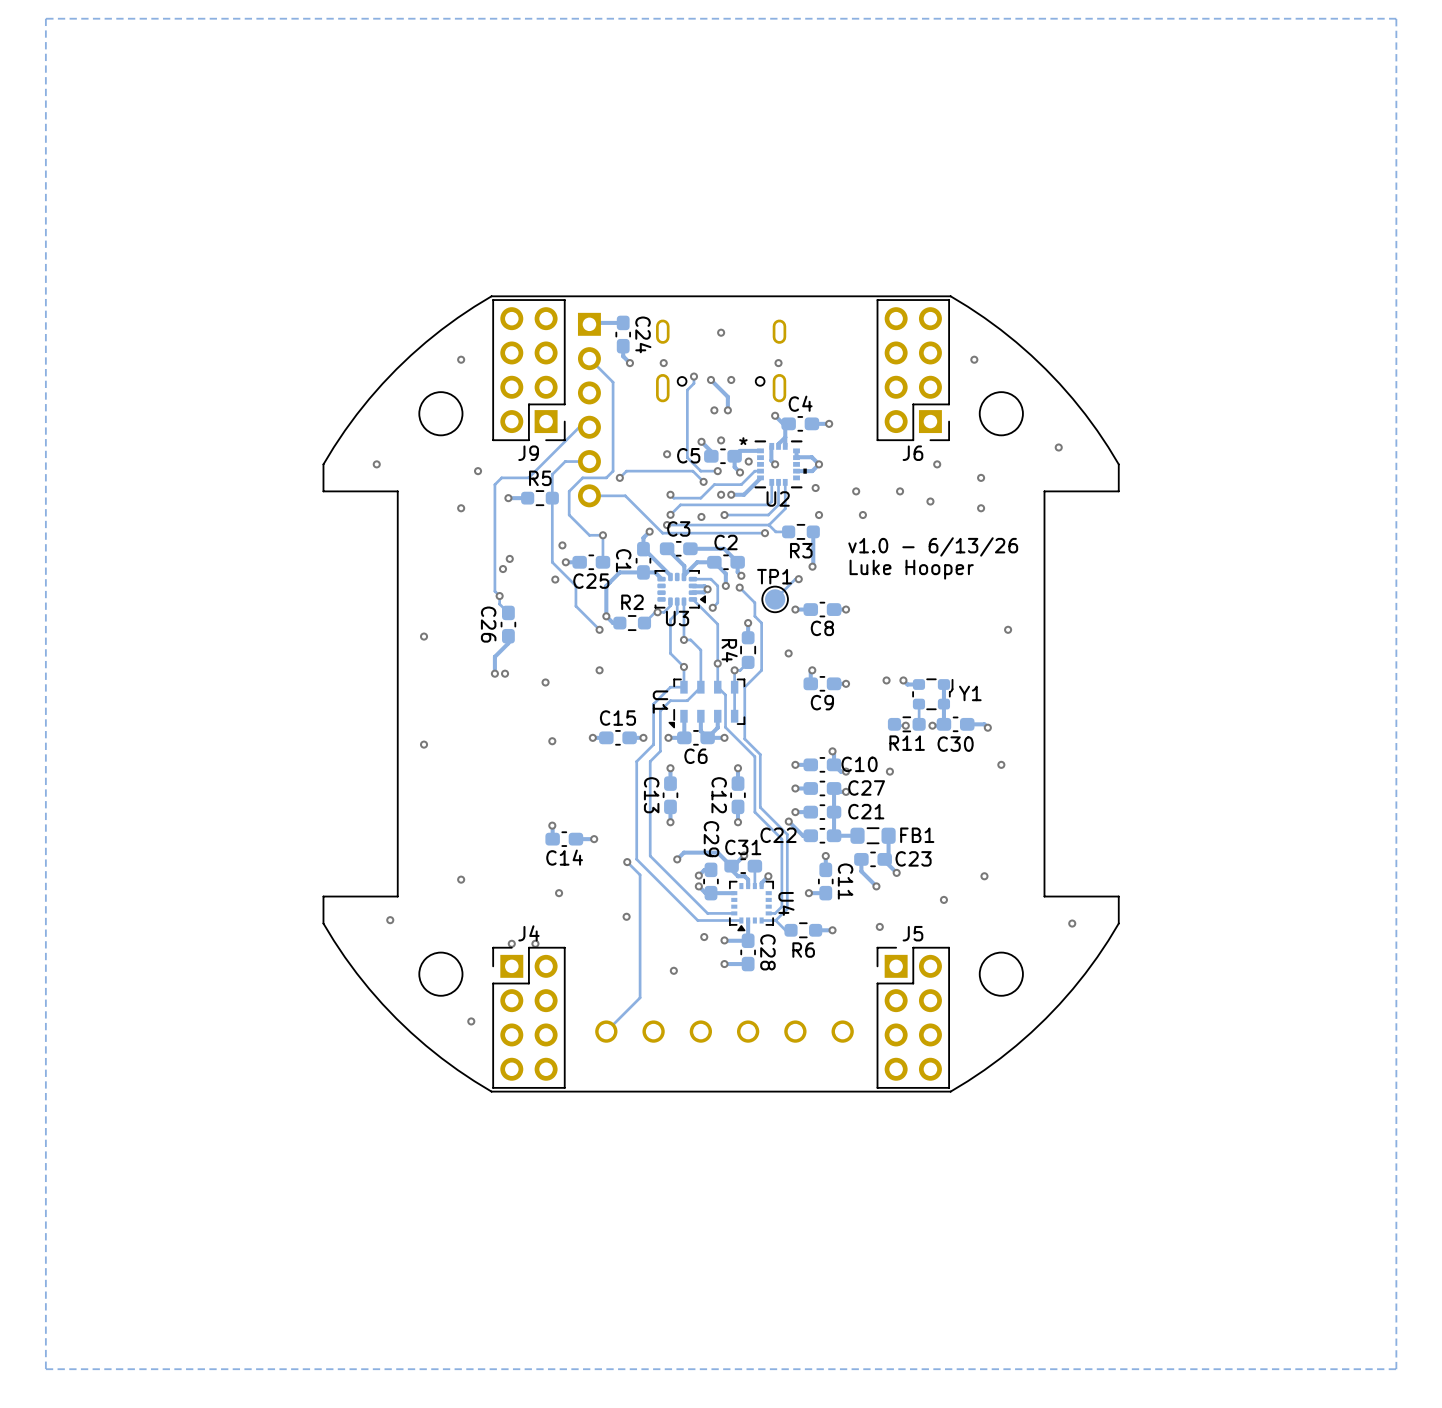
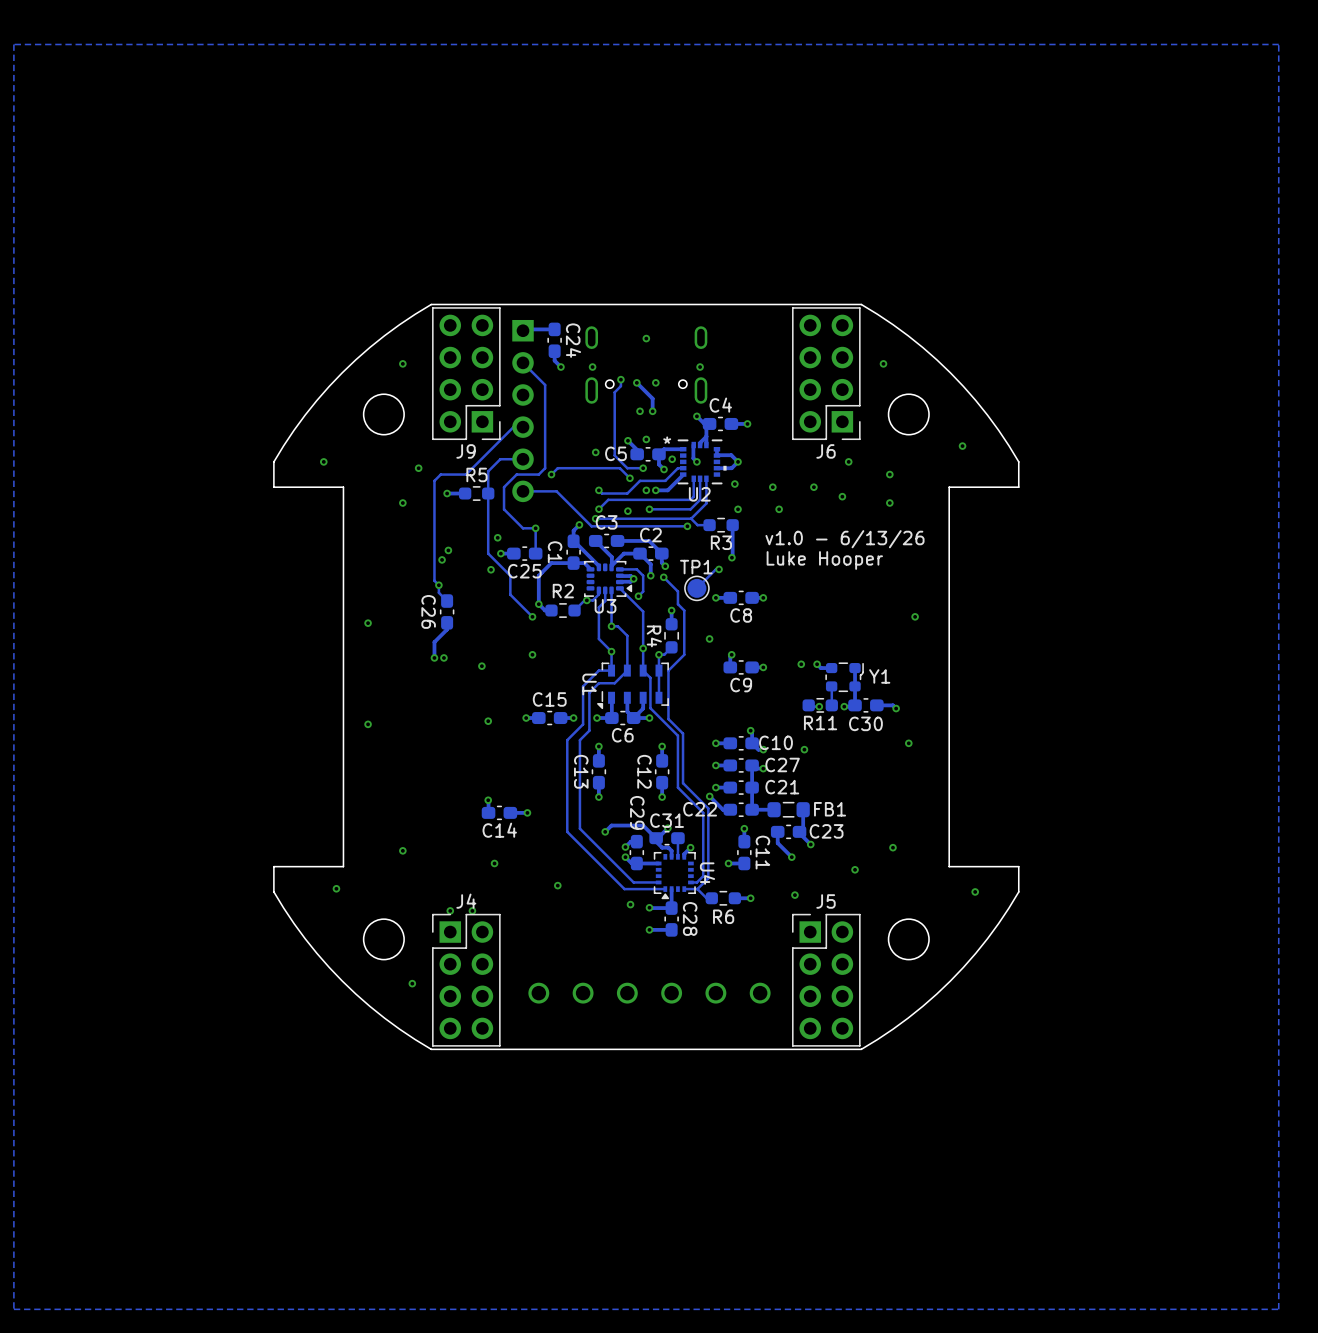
track: (627, 862) (640, 874) (640, 997) (606, 1031) -> none
via: (627, 862) -> none
via: (673, 970) -> none

